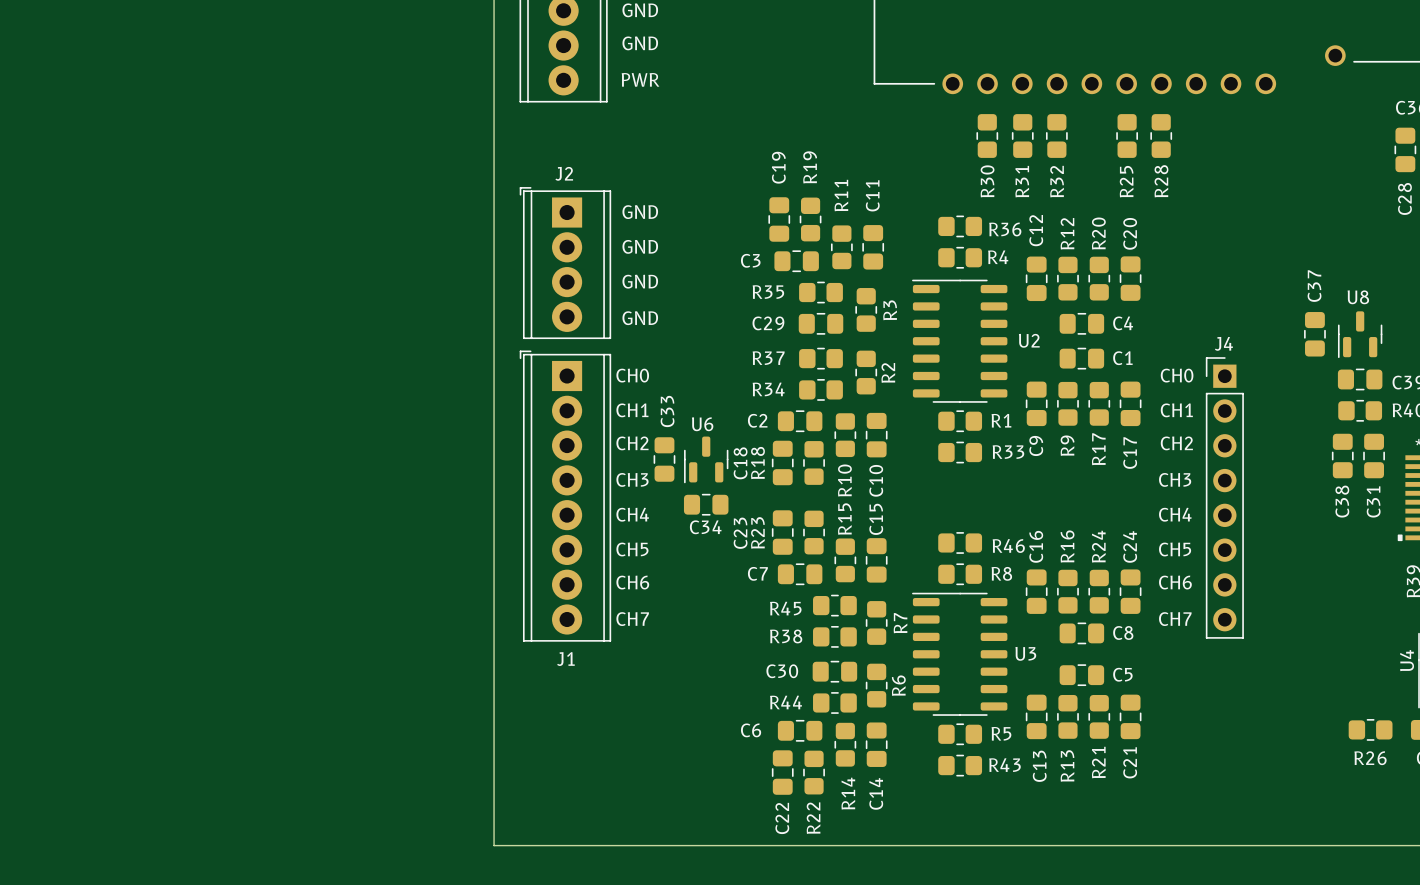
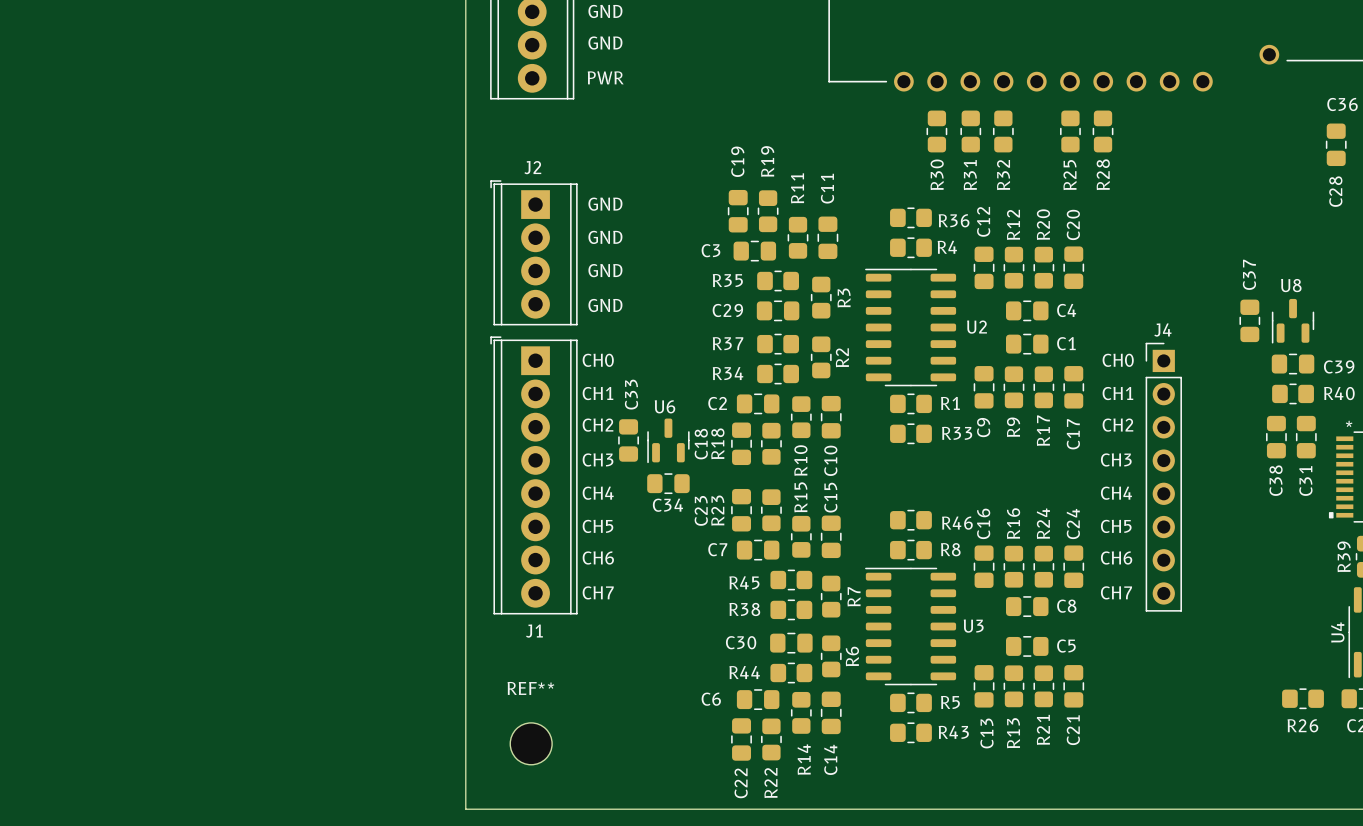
REF**: none -> (531, 743)

